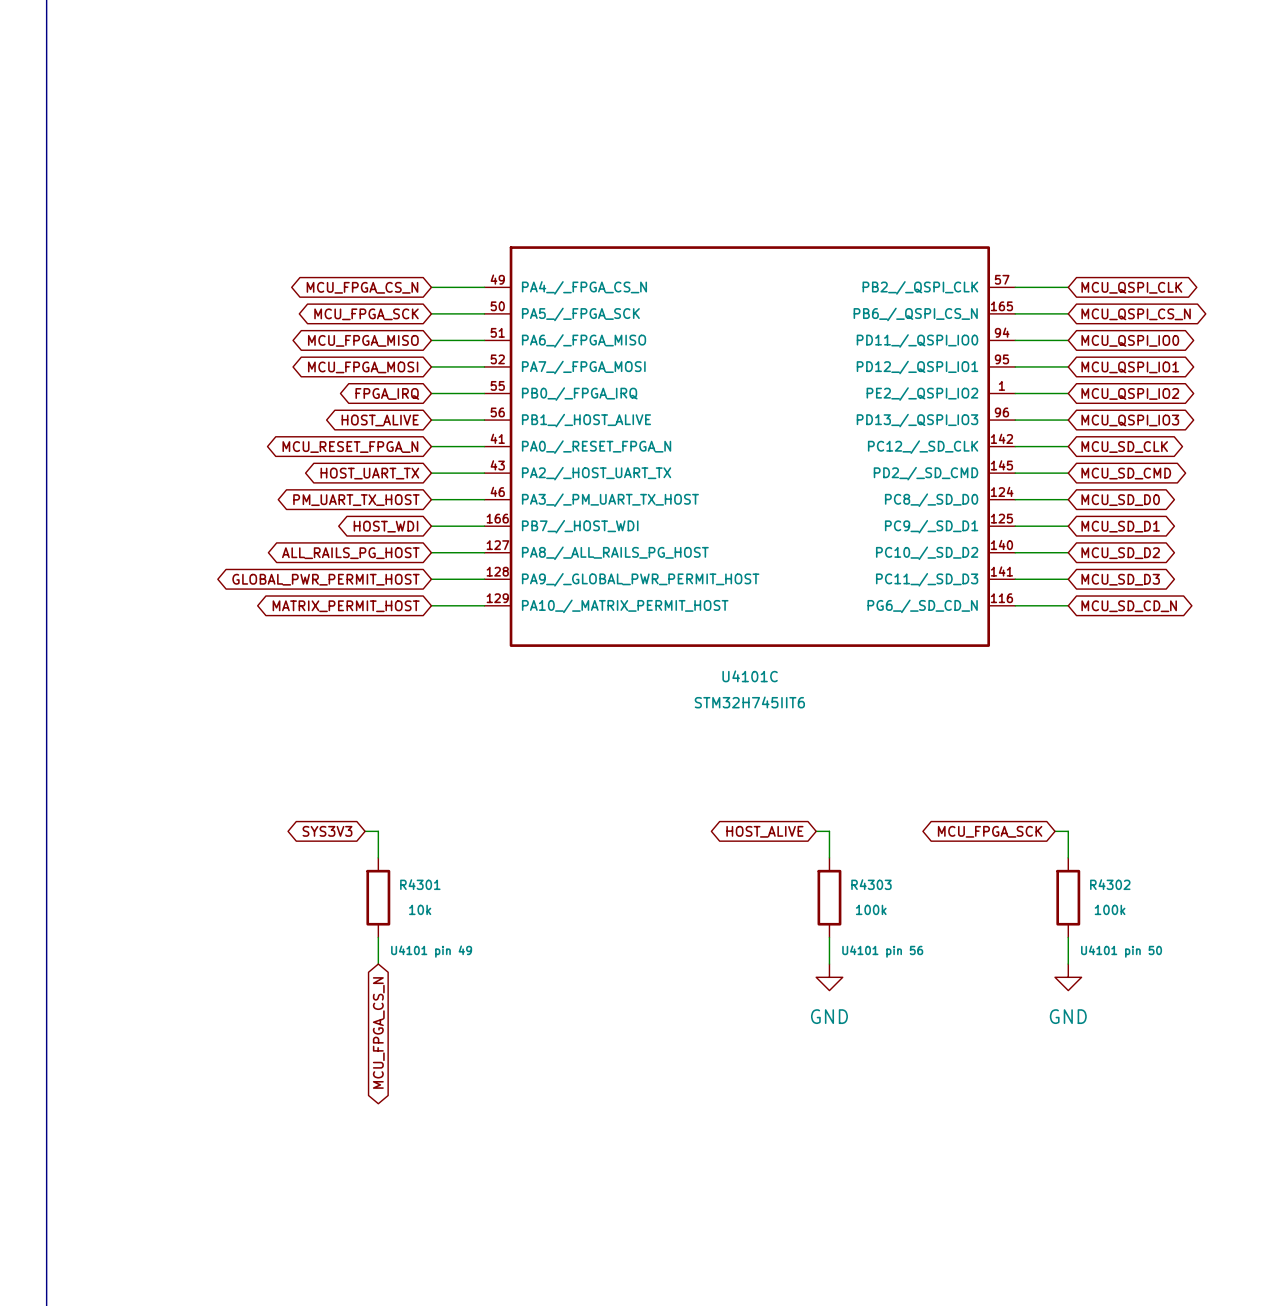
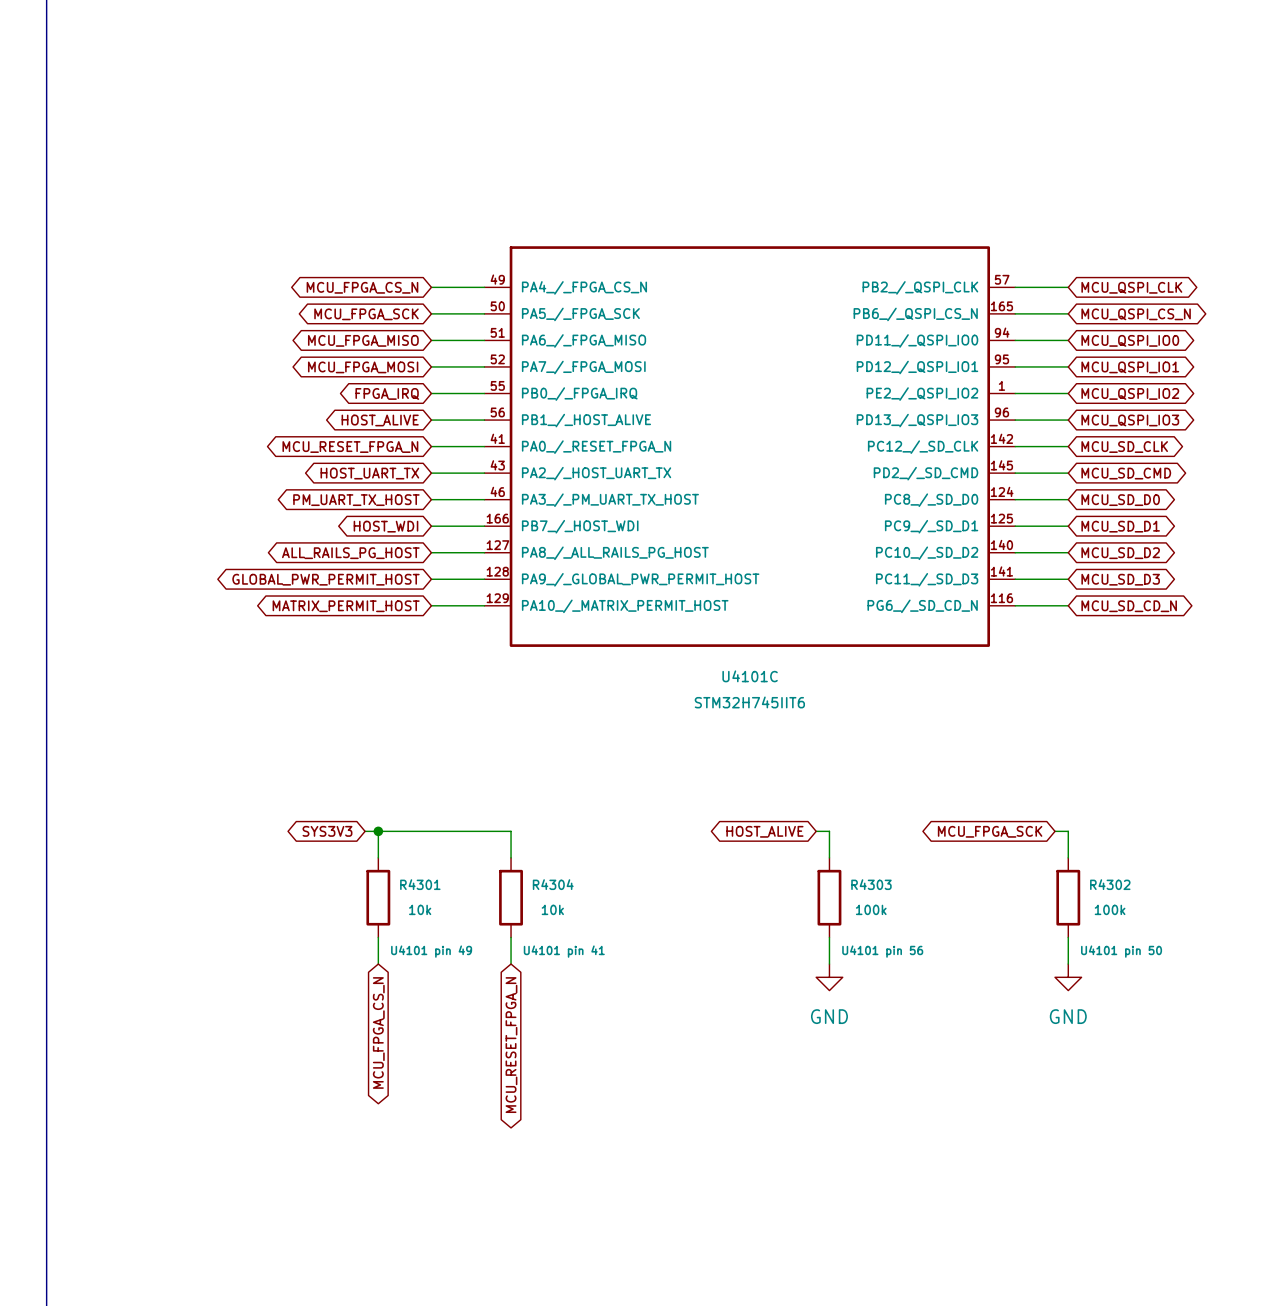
wire: none -> (378, 831) (511, 831) (511, 857)
junction: none -> (378, 831)
R4304: none -> 10k (511, 897)
wire: none -> (511, 937) (511, 964)
global label: none -> MCU_RESET_FPGA_N (511, 1045)

